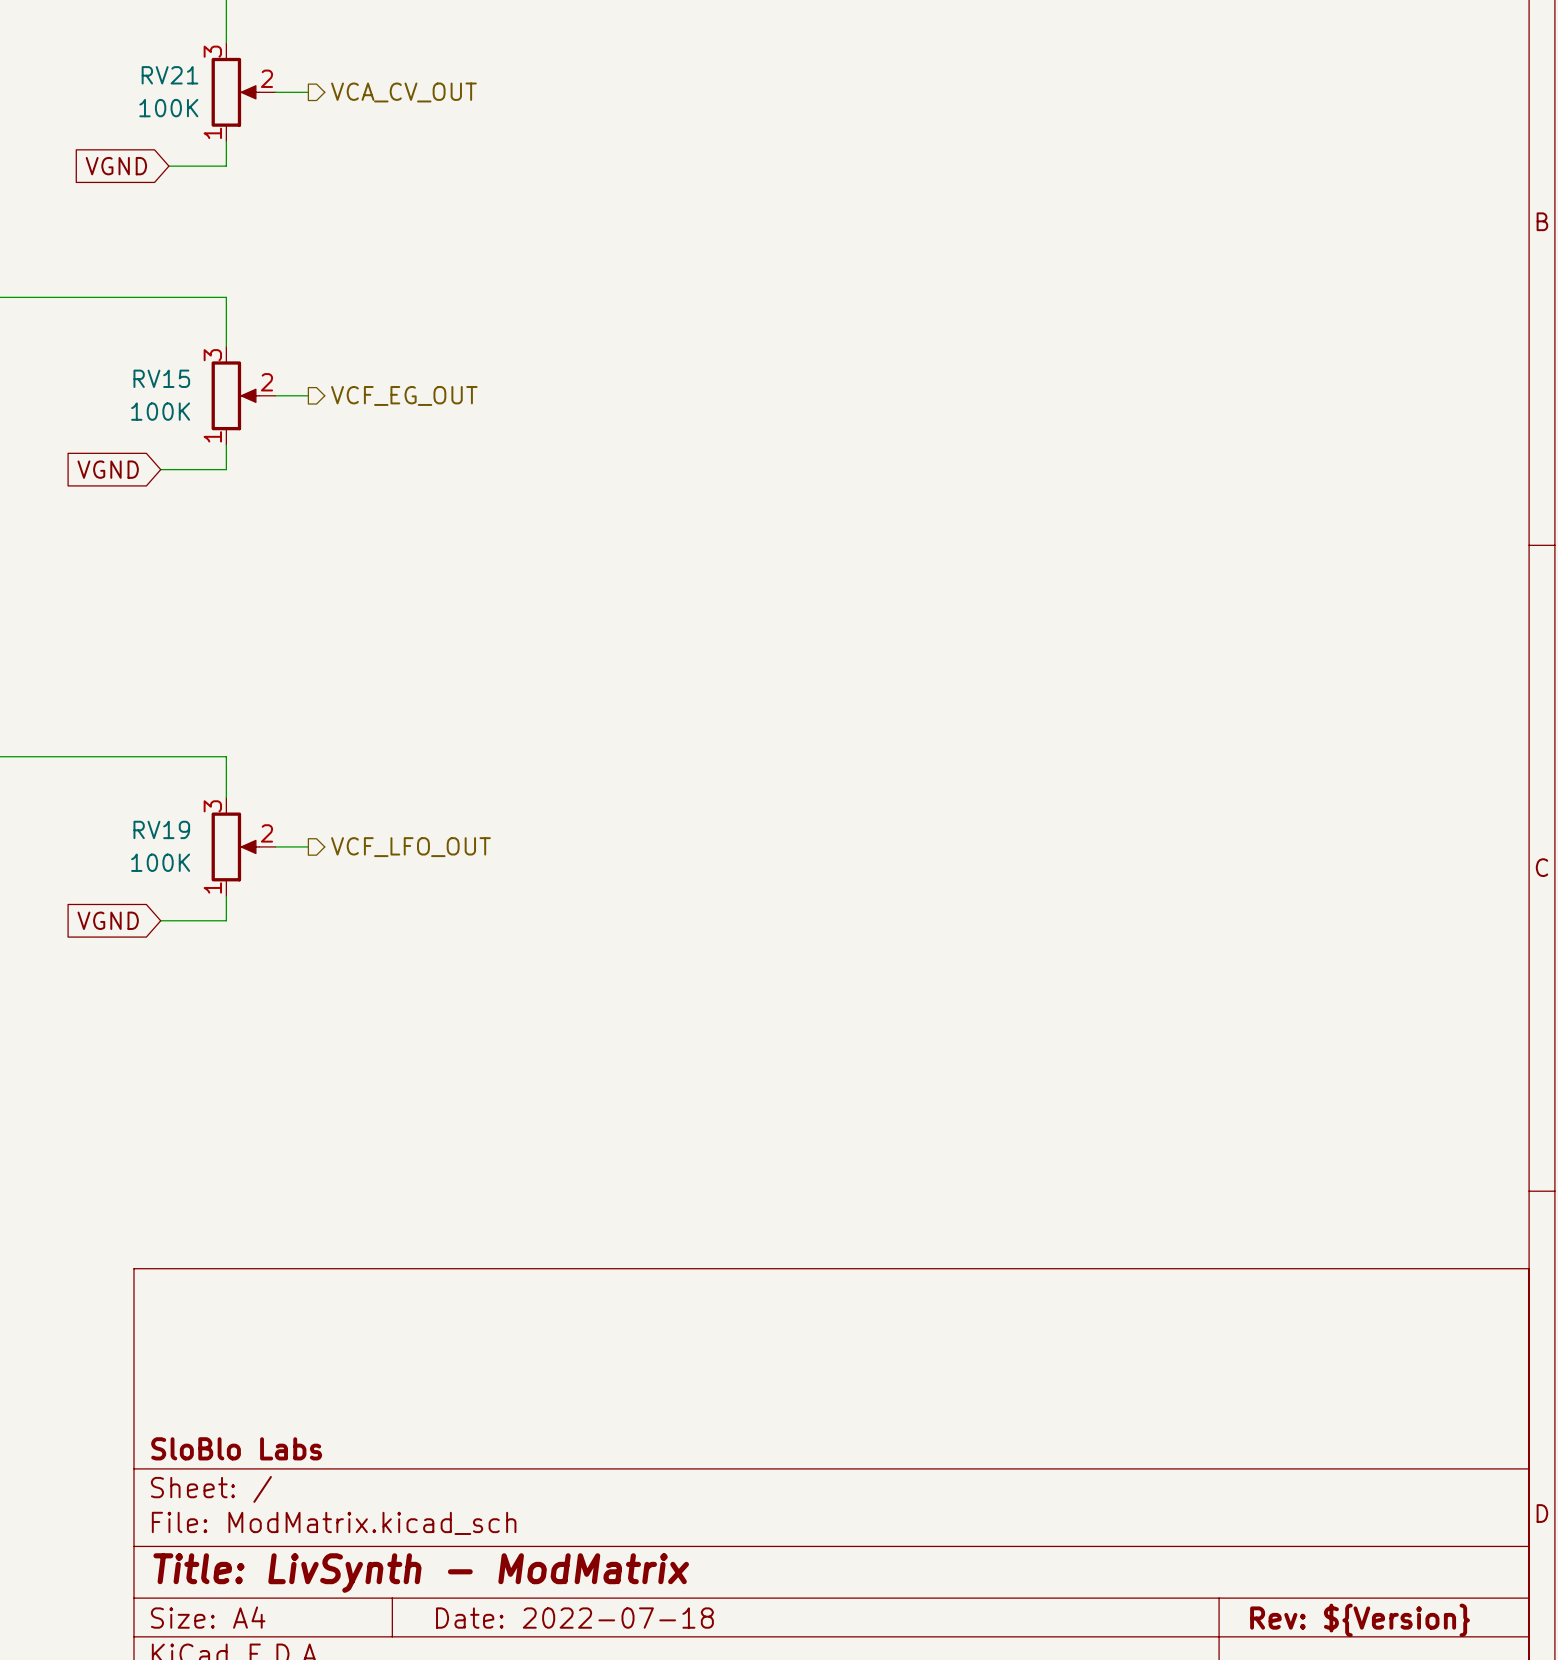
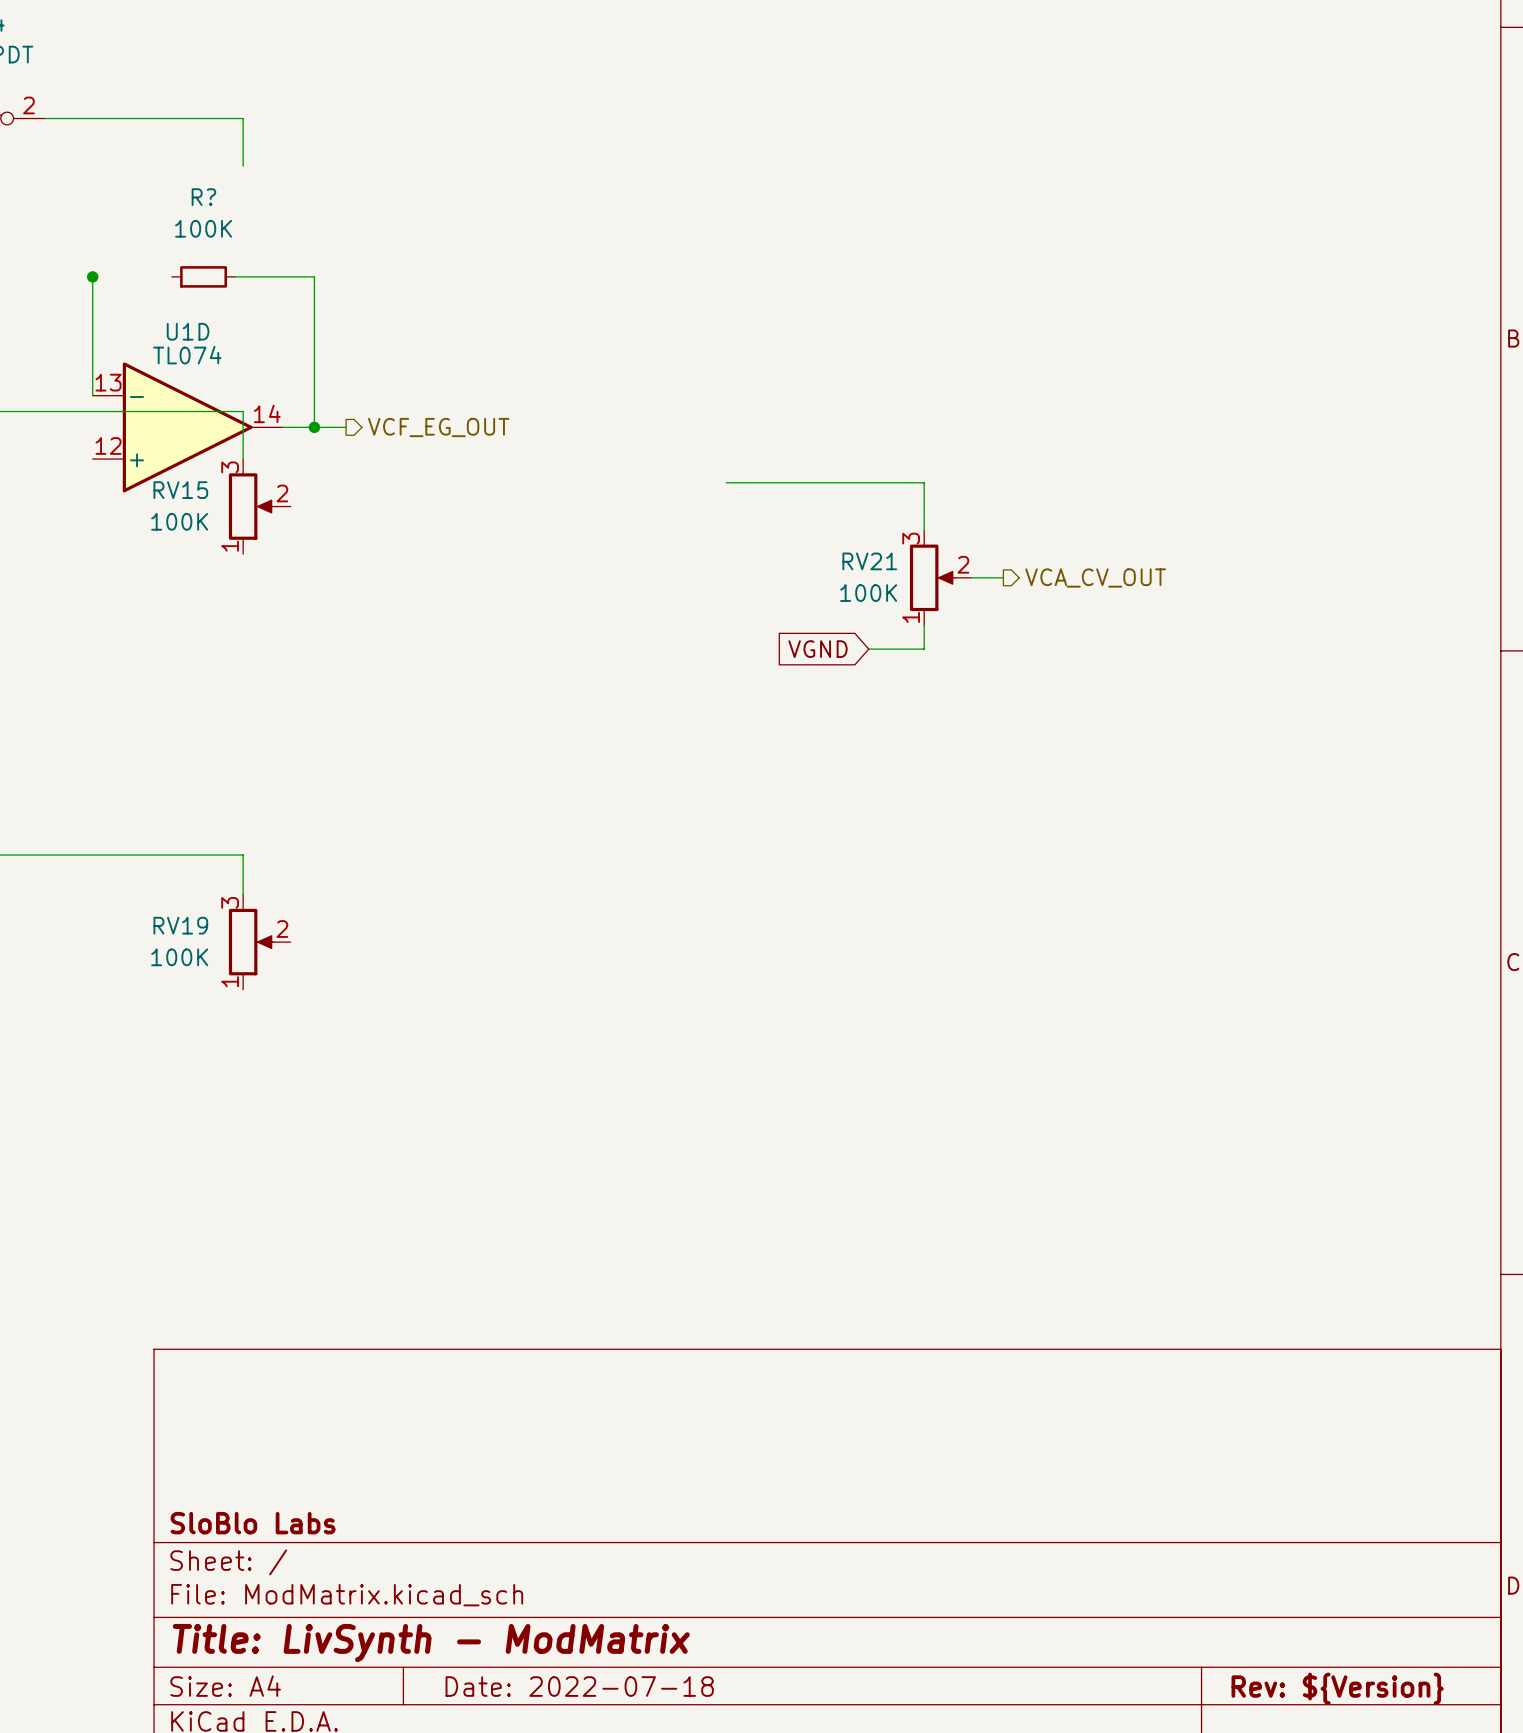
RV21 position: (243, 92) -> (940, 577)
wire: (275, 92) (308, 92) -> none
hierarchical label: VCA_CV_OUT (403, 92) -> none
wire: (226, 141) (226, 166) (168, 166) -> none
wire: none -> (92, 276) (92, 395)
junction: none -> (92, 276)
R?: none -> 100K (203, 276)
wire: none -> (235, 276) (314, 276) (314, 427)
global label: VGND (116, 166) -> none
U1D: none -> TL074 (187, 427)
wire: none -> (282, 427) (346, 427)
junction: none -> (314, 427)
wire: none -> (726, 482) (924, 482) (924, 530)
wire: (275, 395) (308, 395) -> none
hierarchical label position: VCF_EG_OUT (404, 395) -> VCF_EG_OUT (438, 427)
wire: (226, 445) (226, 469) (160, 469) -> none
global label: VGND (108, 469) -> none
wire: none -> (971, 577) (1003, 577)
hierarchical label: none -> VCA_CV_OUT (1095, 577)
wire: none -> (924, 625) (924, 649) (868, 649)
global label: none -> VGND (818, 649)
wire: (275, 846) (308, 846) -> none
hierarchical label: VCF_LFO_OUT (410, 847) -> none
wire: (226, 896) (226, 920) (160, 920) -> none
global label: VGND (108, 920) -> none

